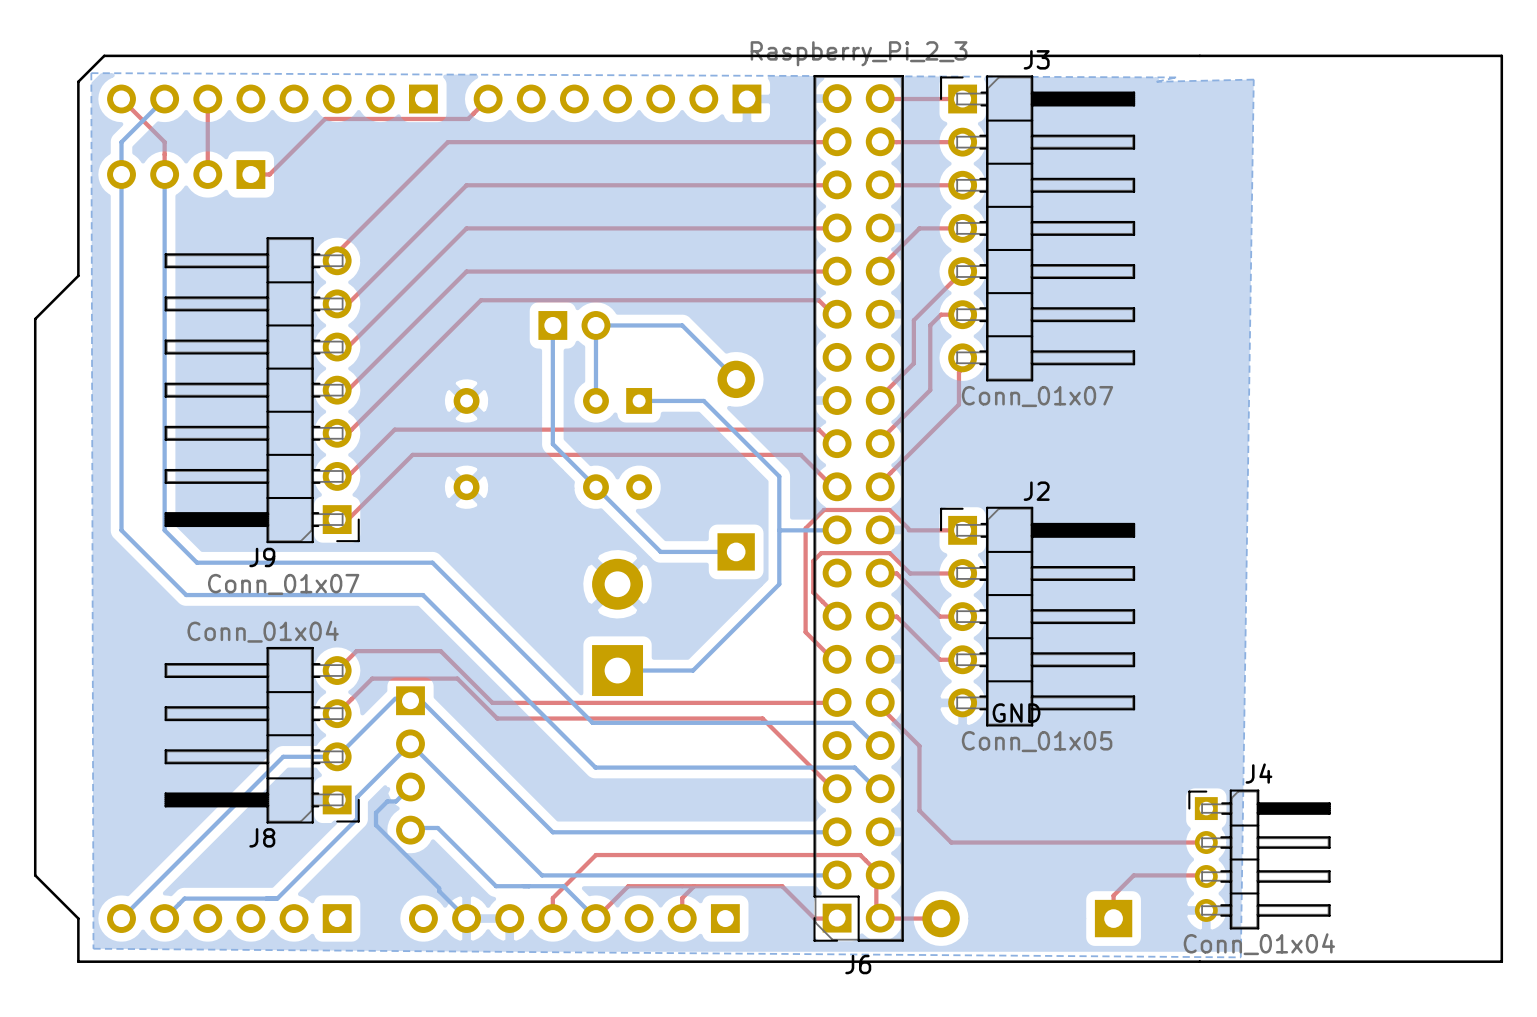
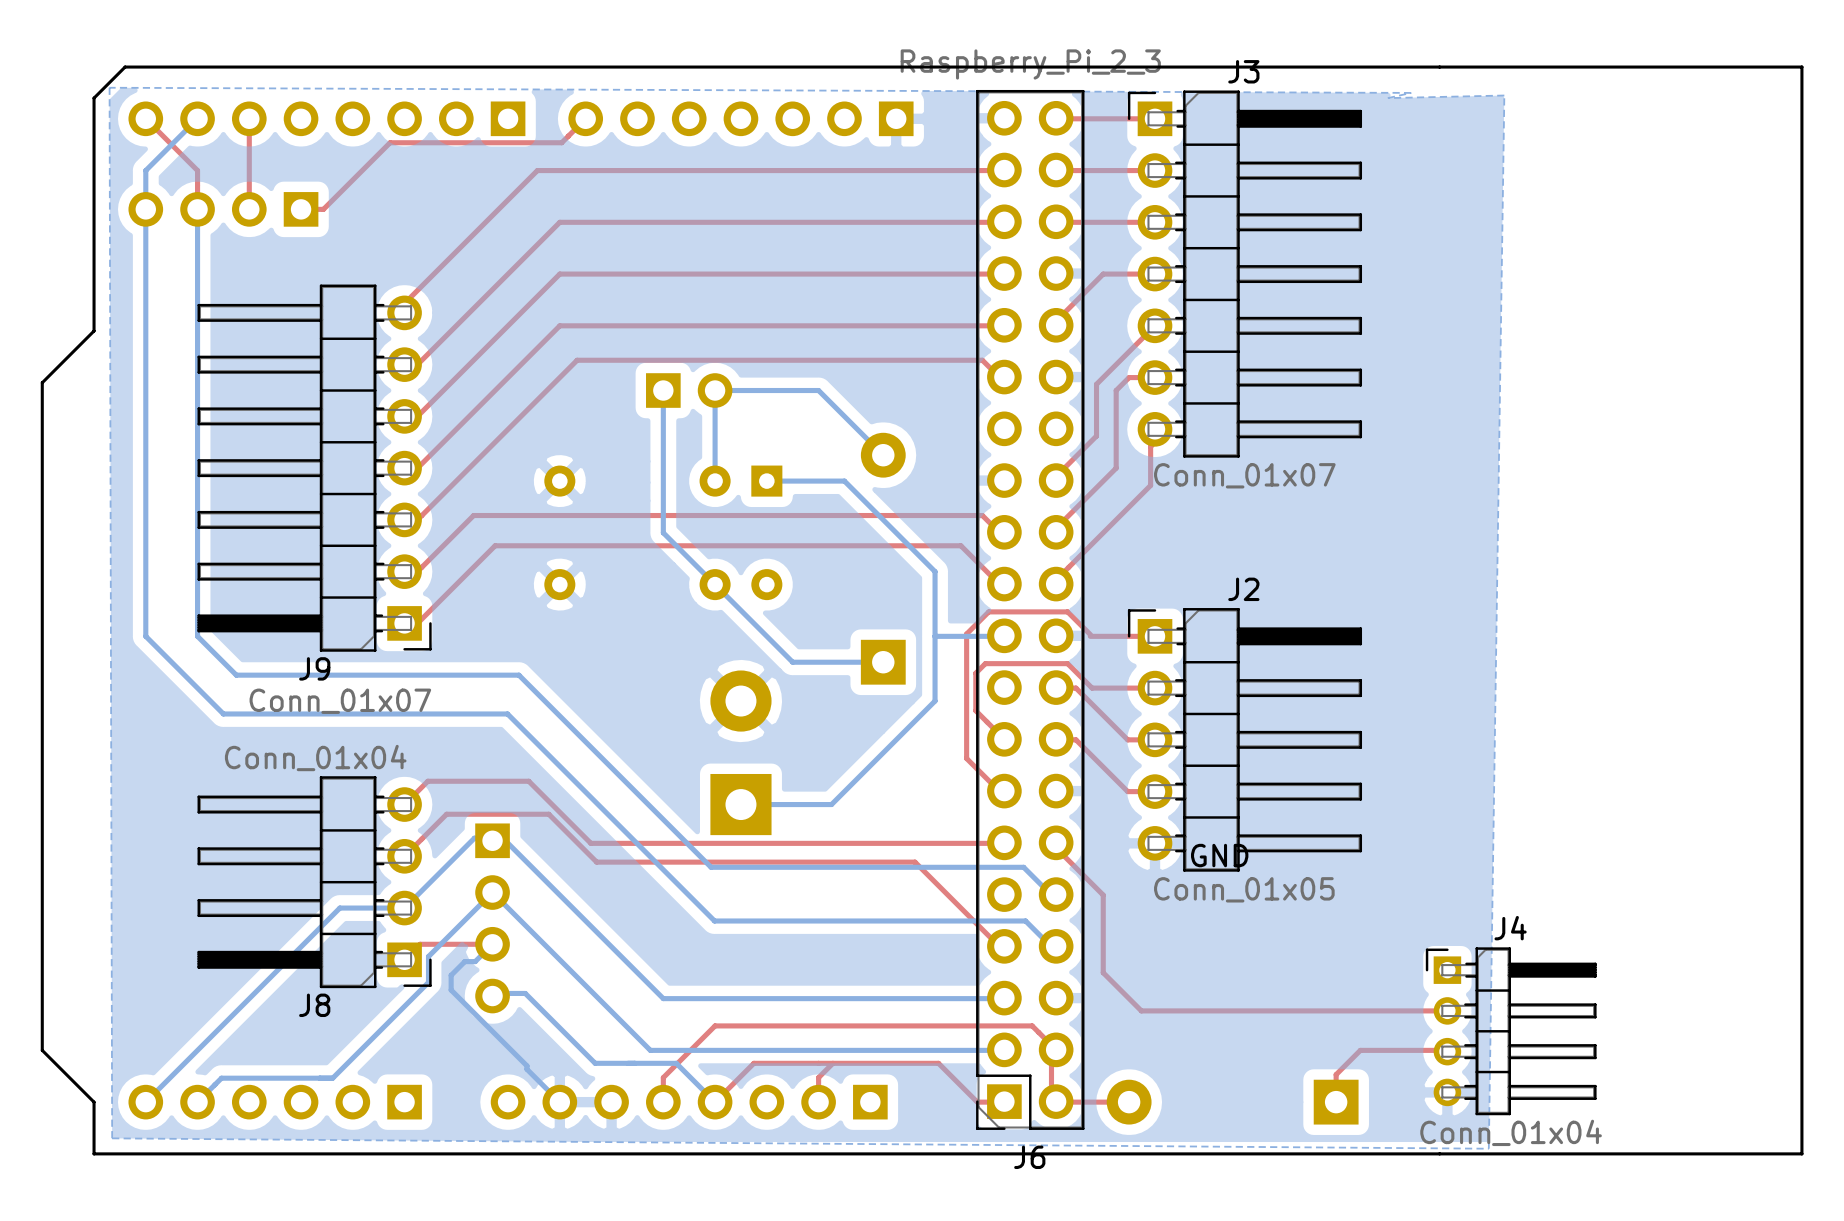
top track: none -> (492, 944) (420, 944) (404, 959)

